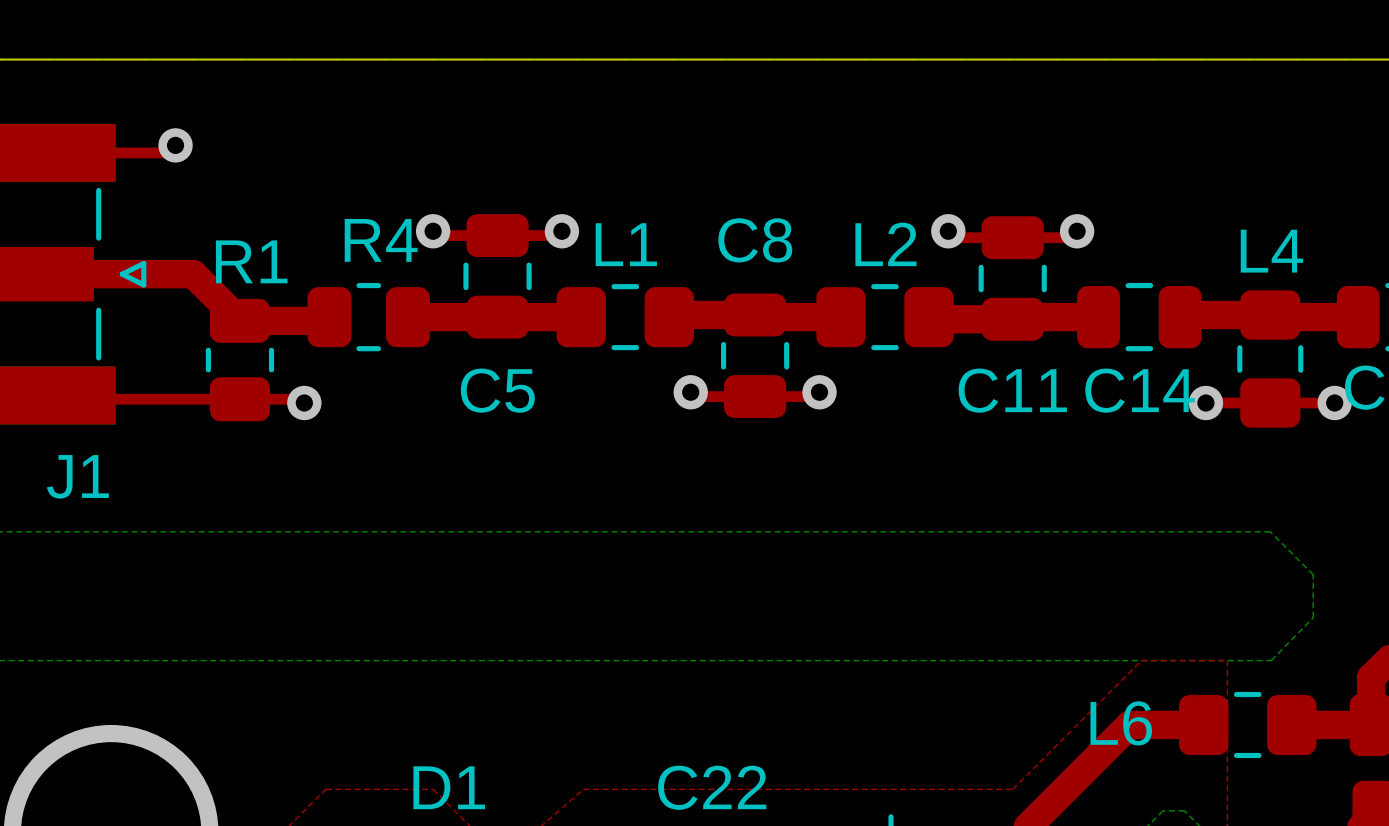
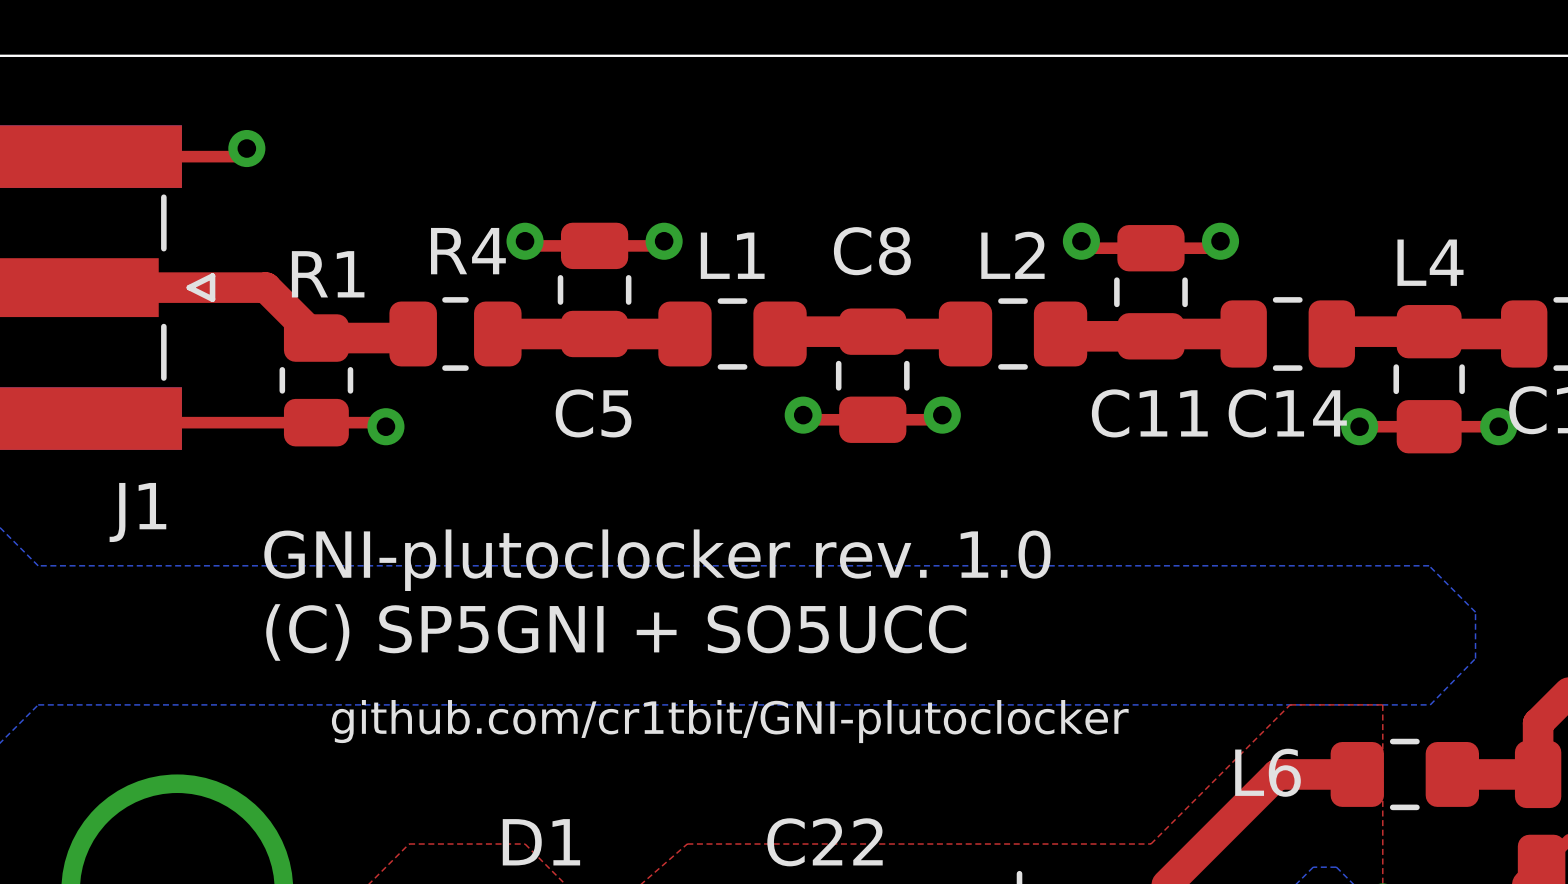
text: none -> GNI-plutoclocker rev. 1.0 (657, 560)
text: none -> (C) SP5GNI + SO5UCC (616, 632)
text: none -> github.com/cr1tbit/GNI-plutoclocker (730, 721)

